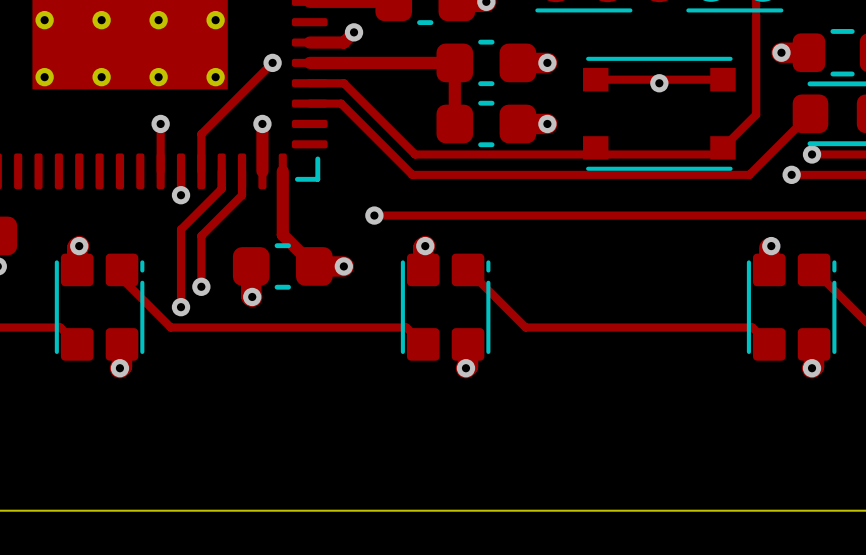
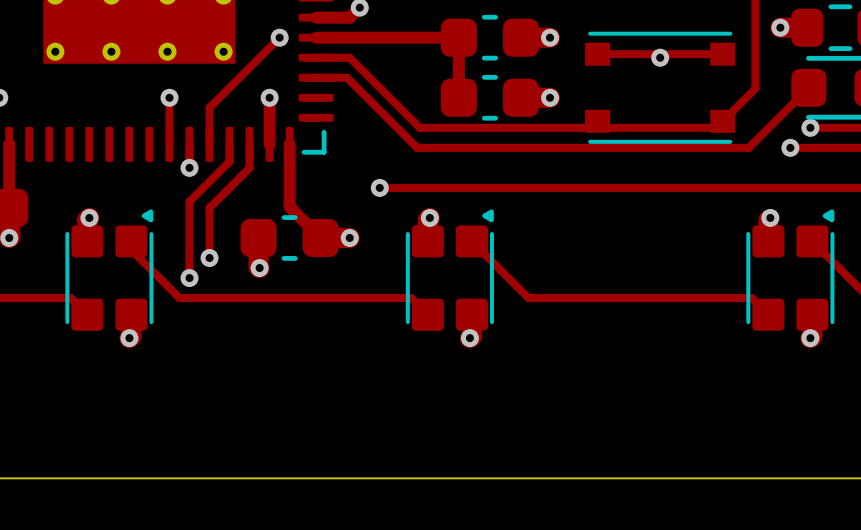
part footprint: [54, 253, 145, 361] -> [65, 209, 154, 331]
part footprint: [400, 253, 491, 361] -> [405, 209, 494, 331]
part footprint: [746, 253, 837, 361] -> [746, 209, 835, 331]

